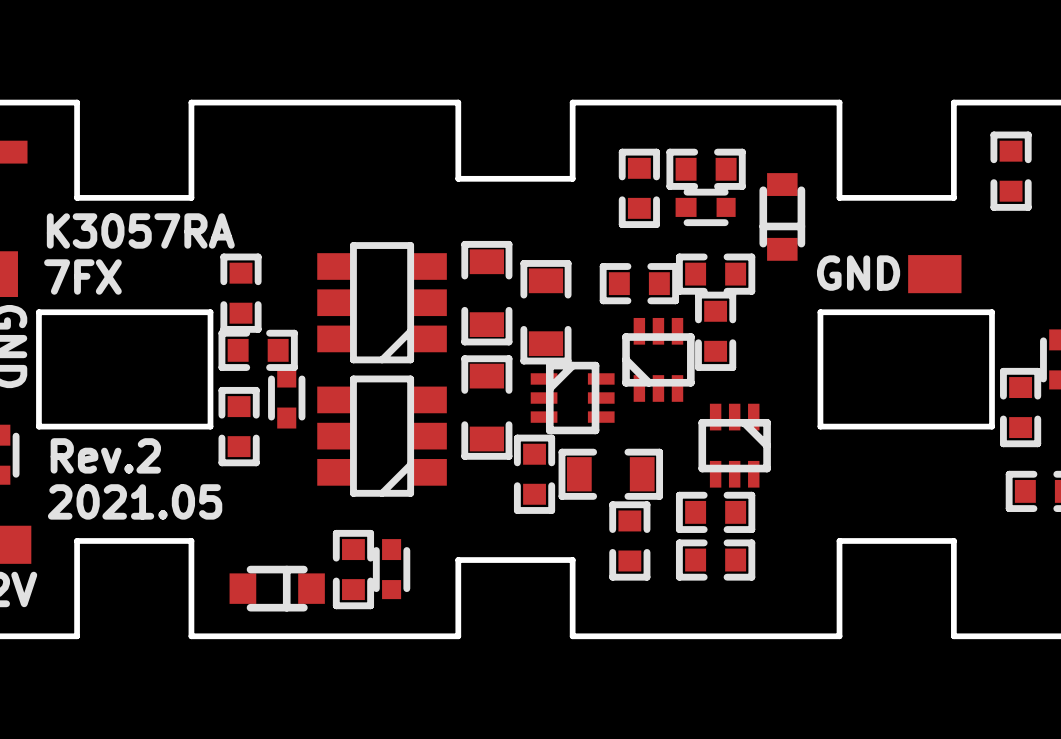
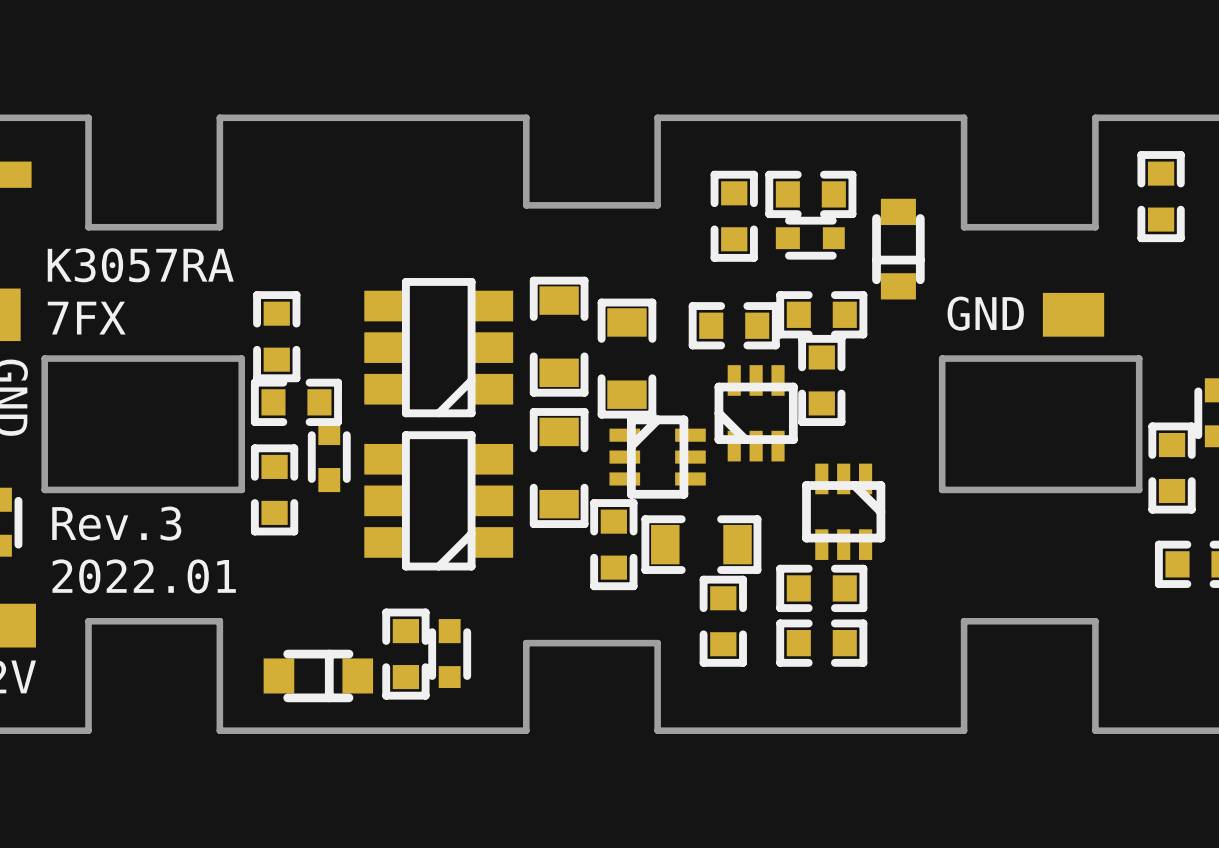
text: Rev.2 (105, 455) -> Rev.3 (116, 523)
text: 2021.05 (135, 501) -> 2022.01 (144, 576)

